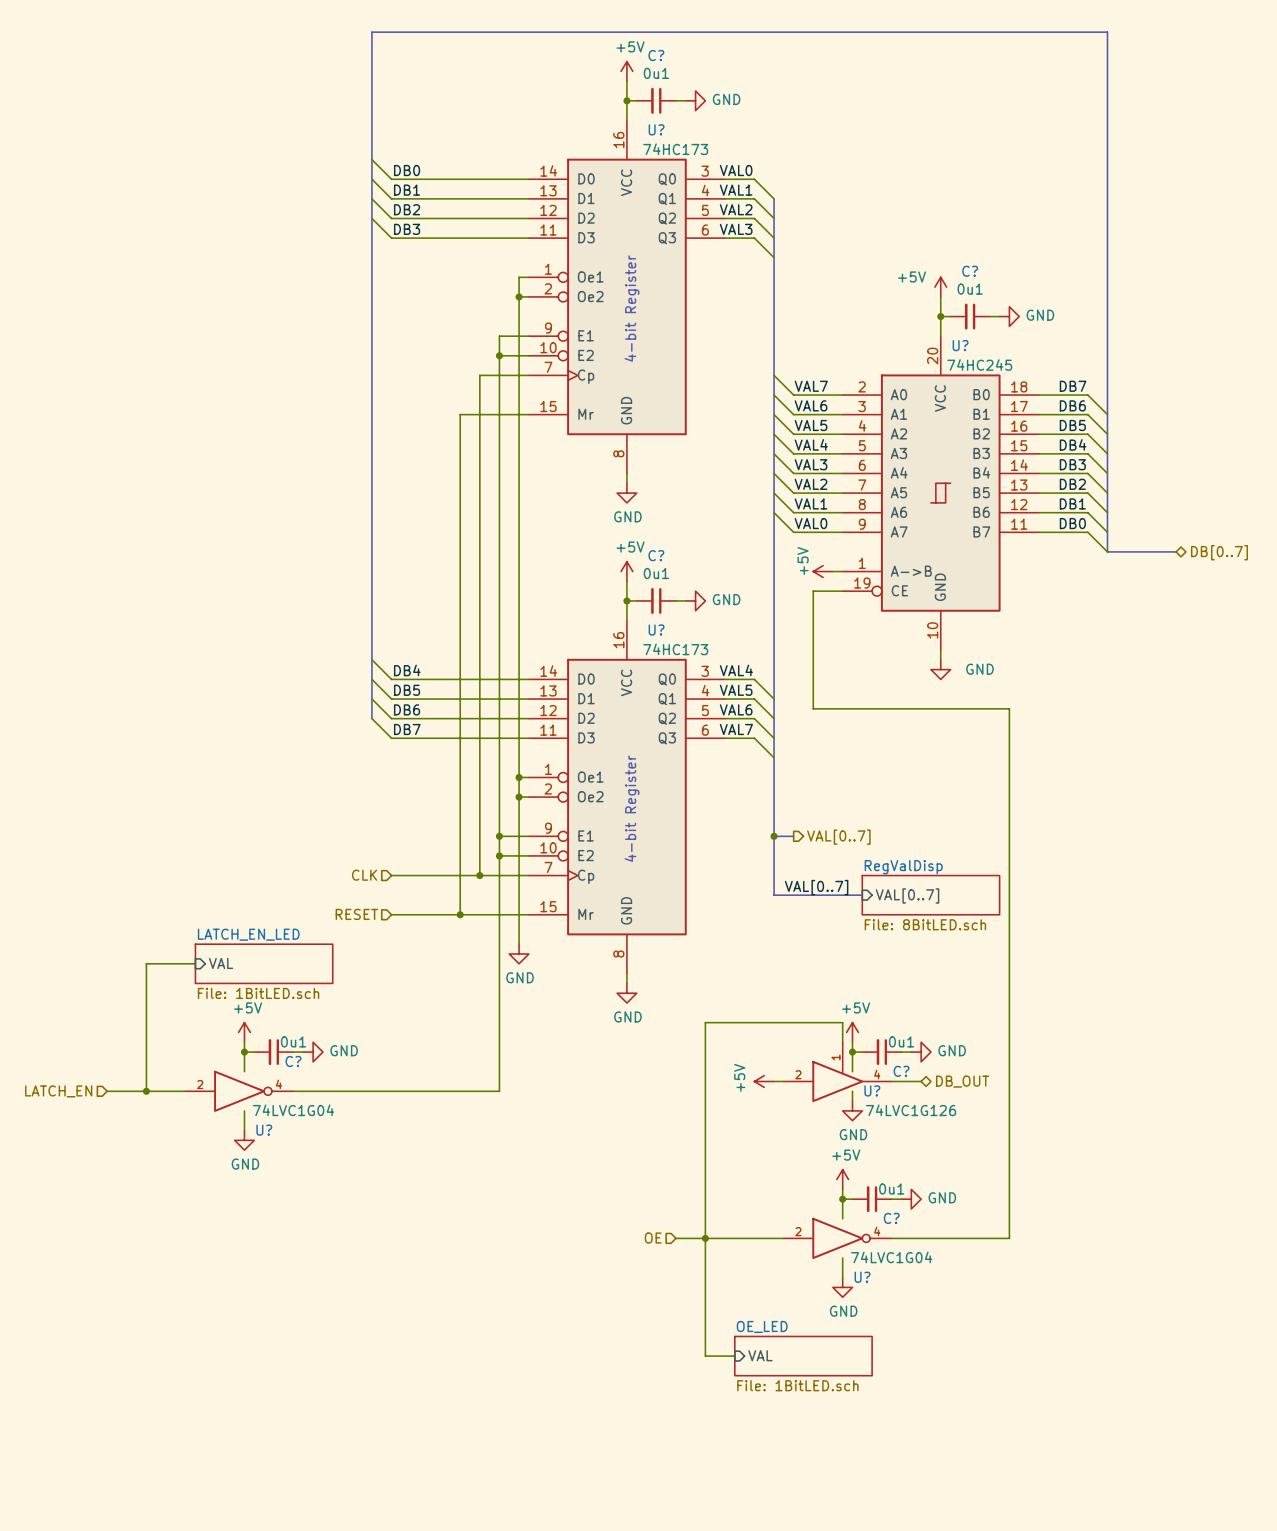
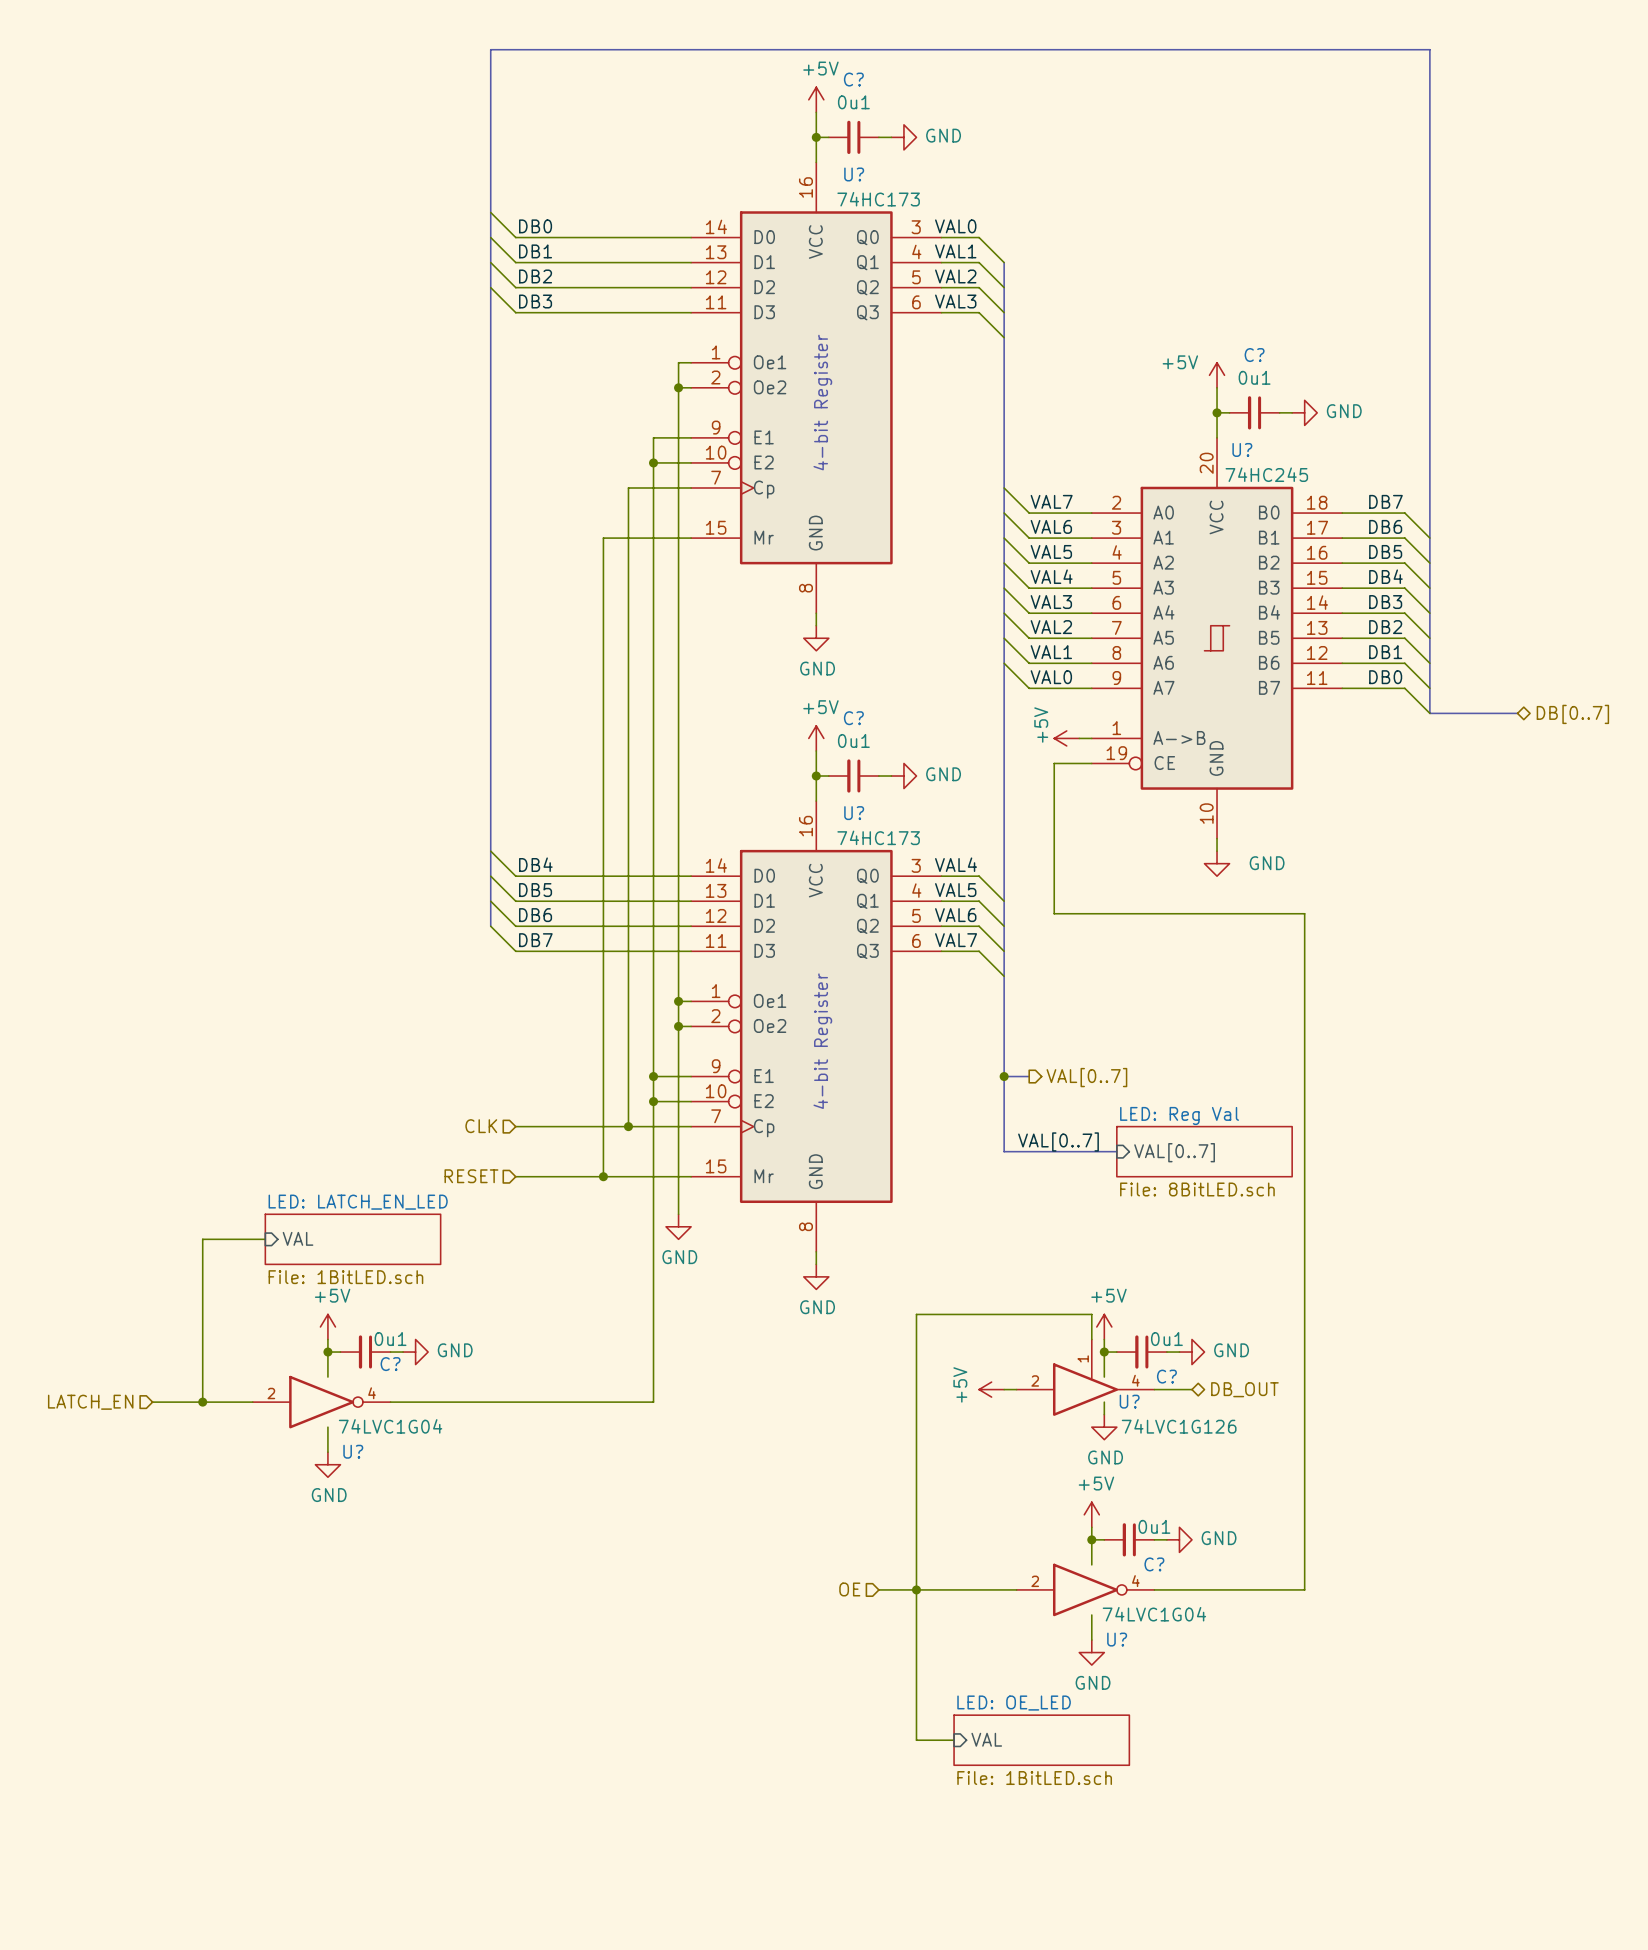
sheet RegValDisp name: RegValDisp (903, 867) -> LED: Reg Val (1179, 1115)
sheet LATCH_EN_LED name: LATCH_EN_LED (248, 934) -> LED: LATCH_EN_LED (358, 1202)
sheet OE_LED name: OE_LED (762, 1326) -> LED: OE_LED (1014, 1703)

